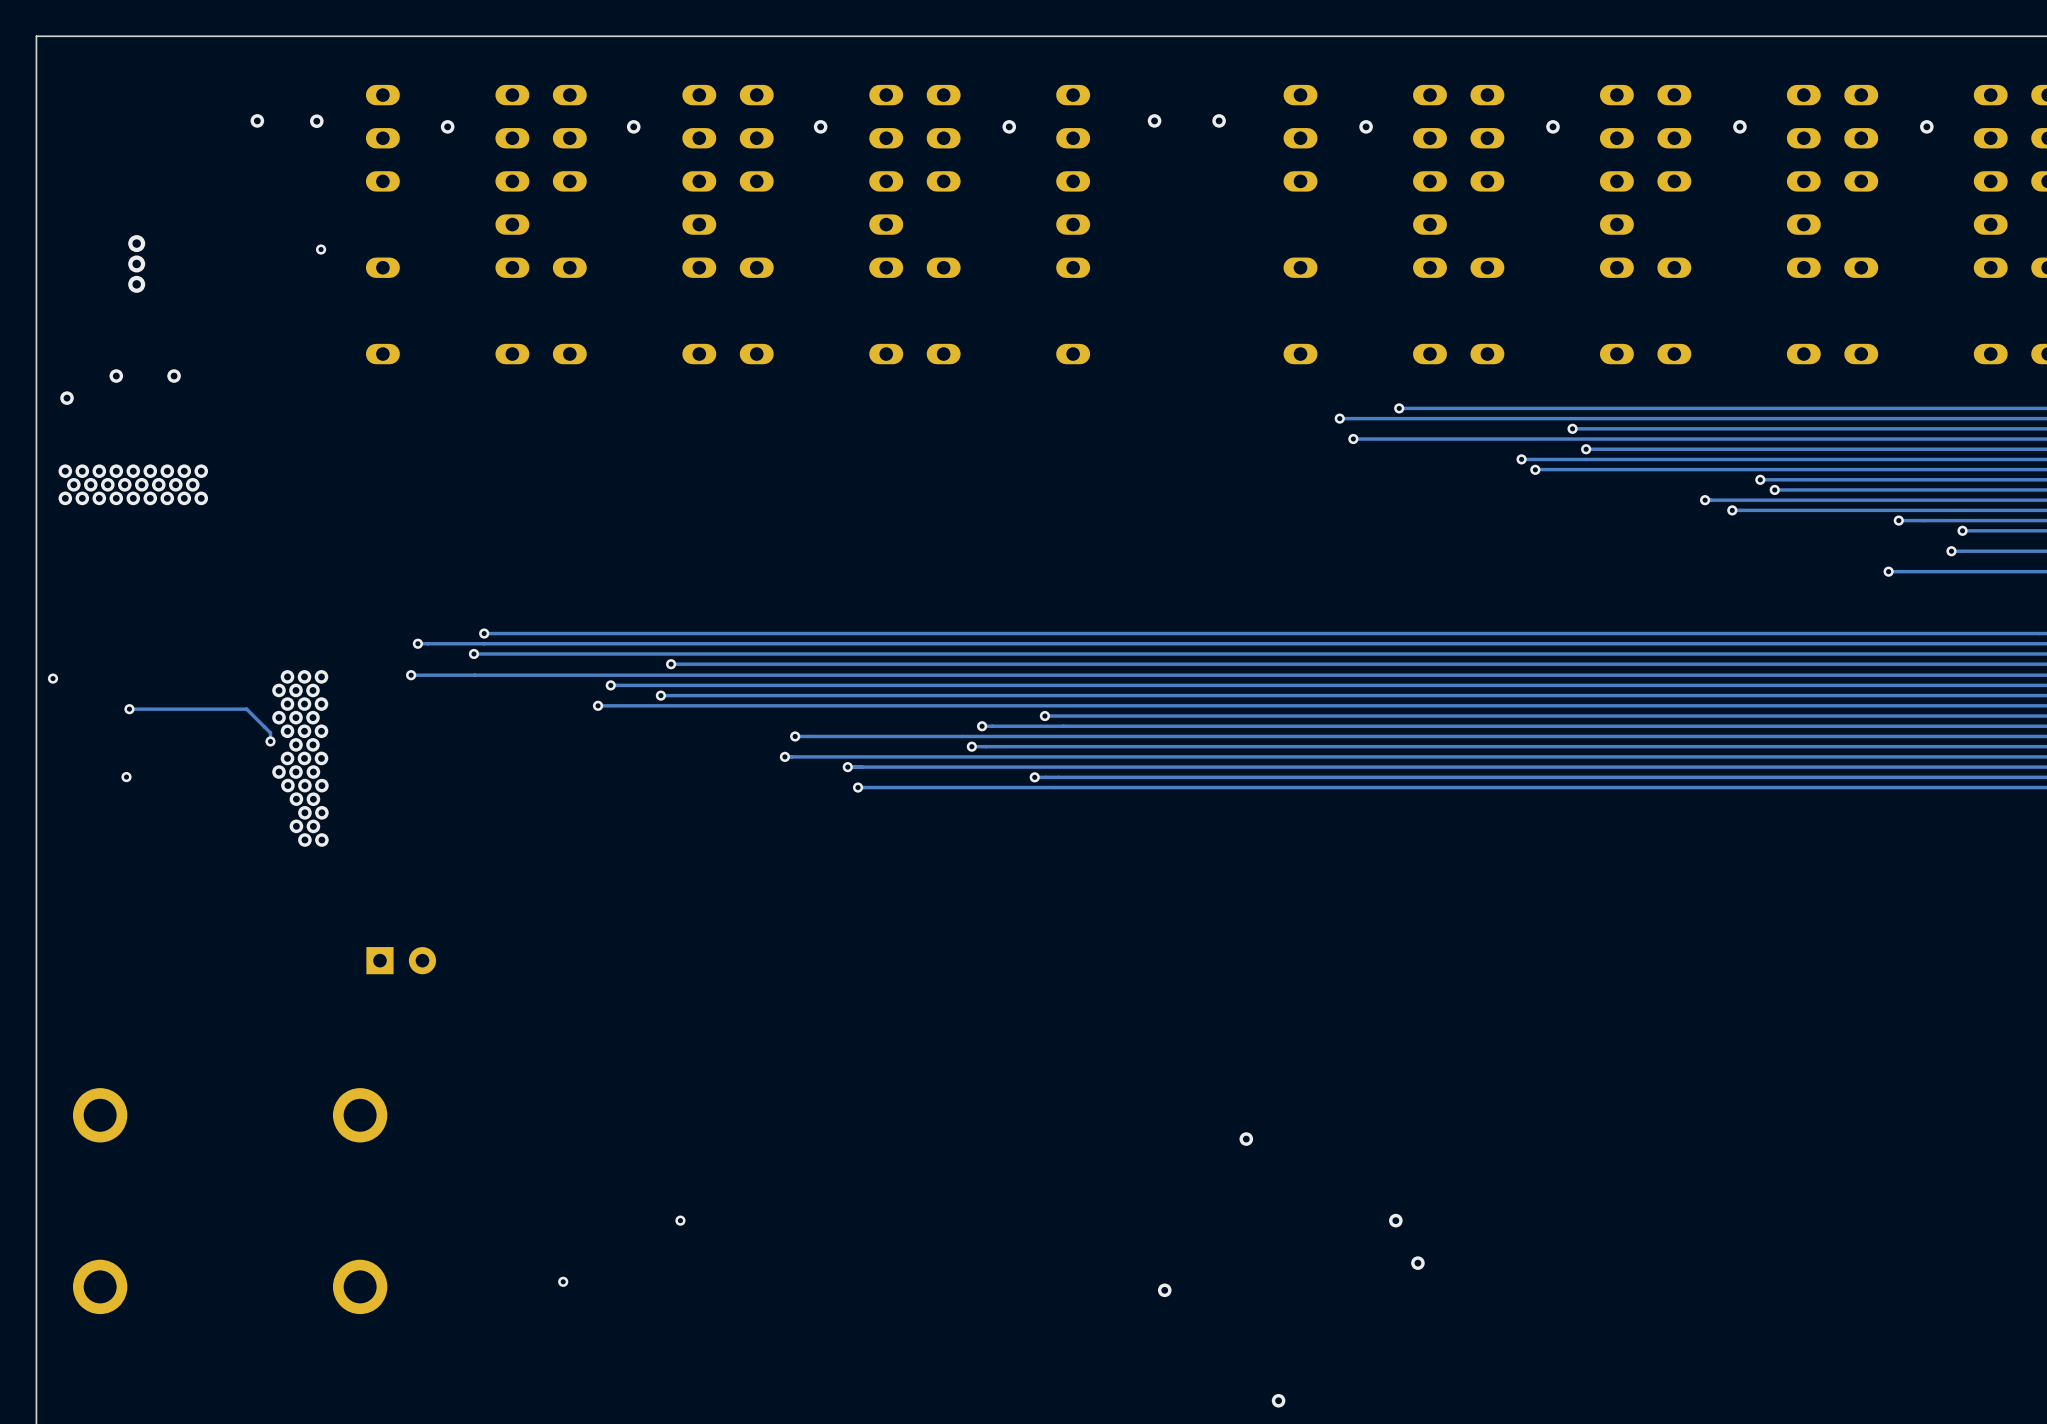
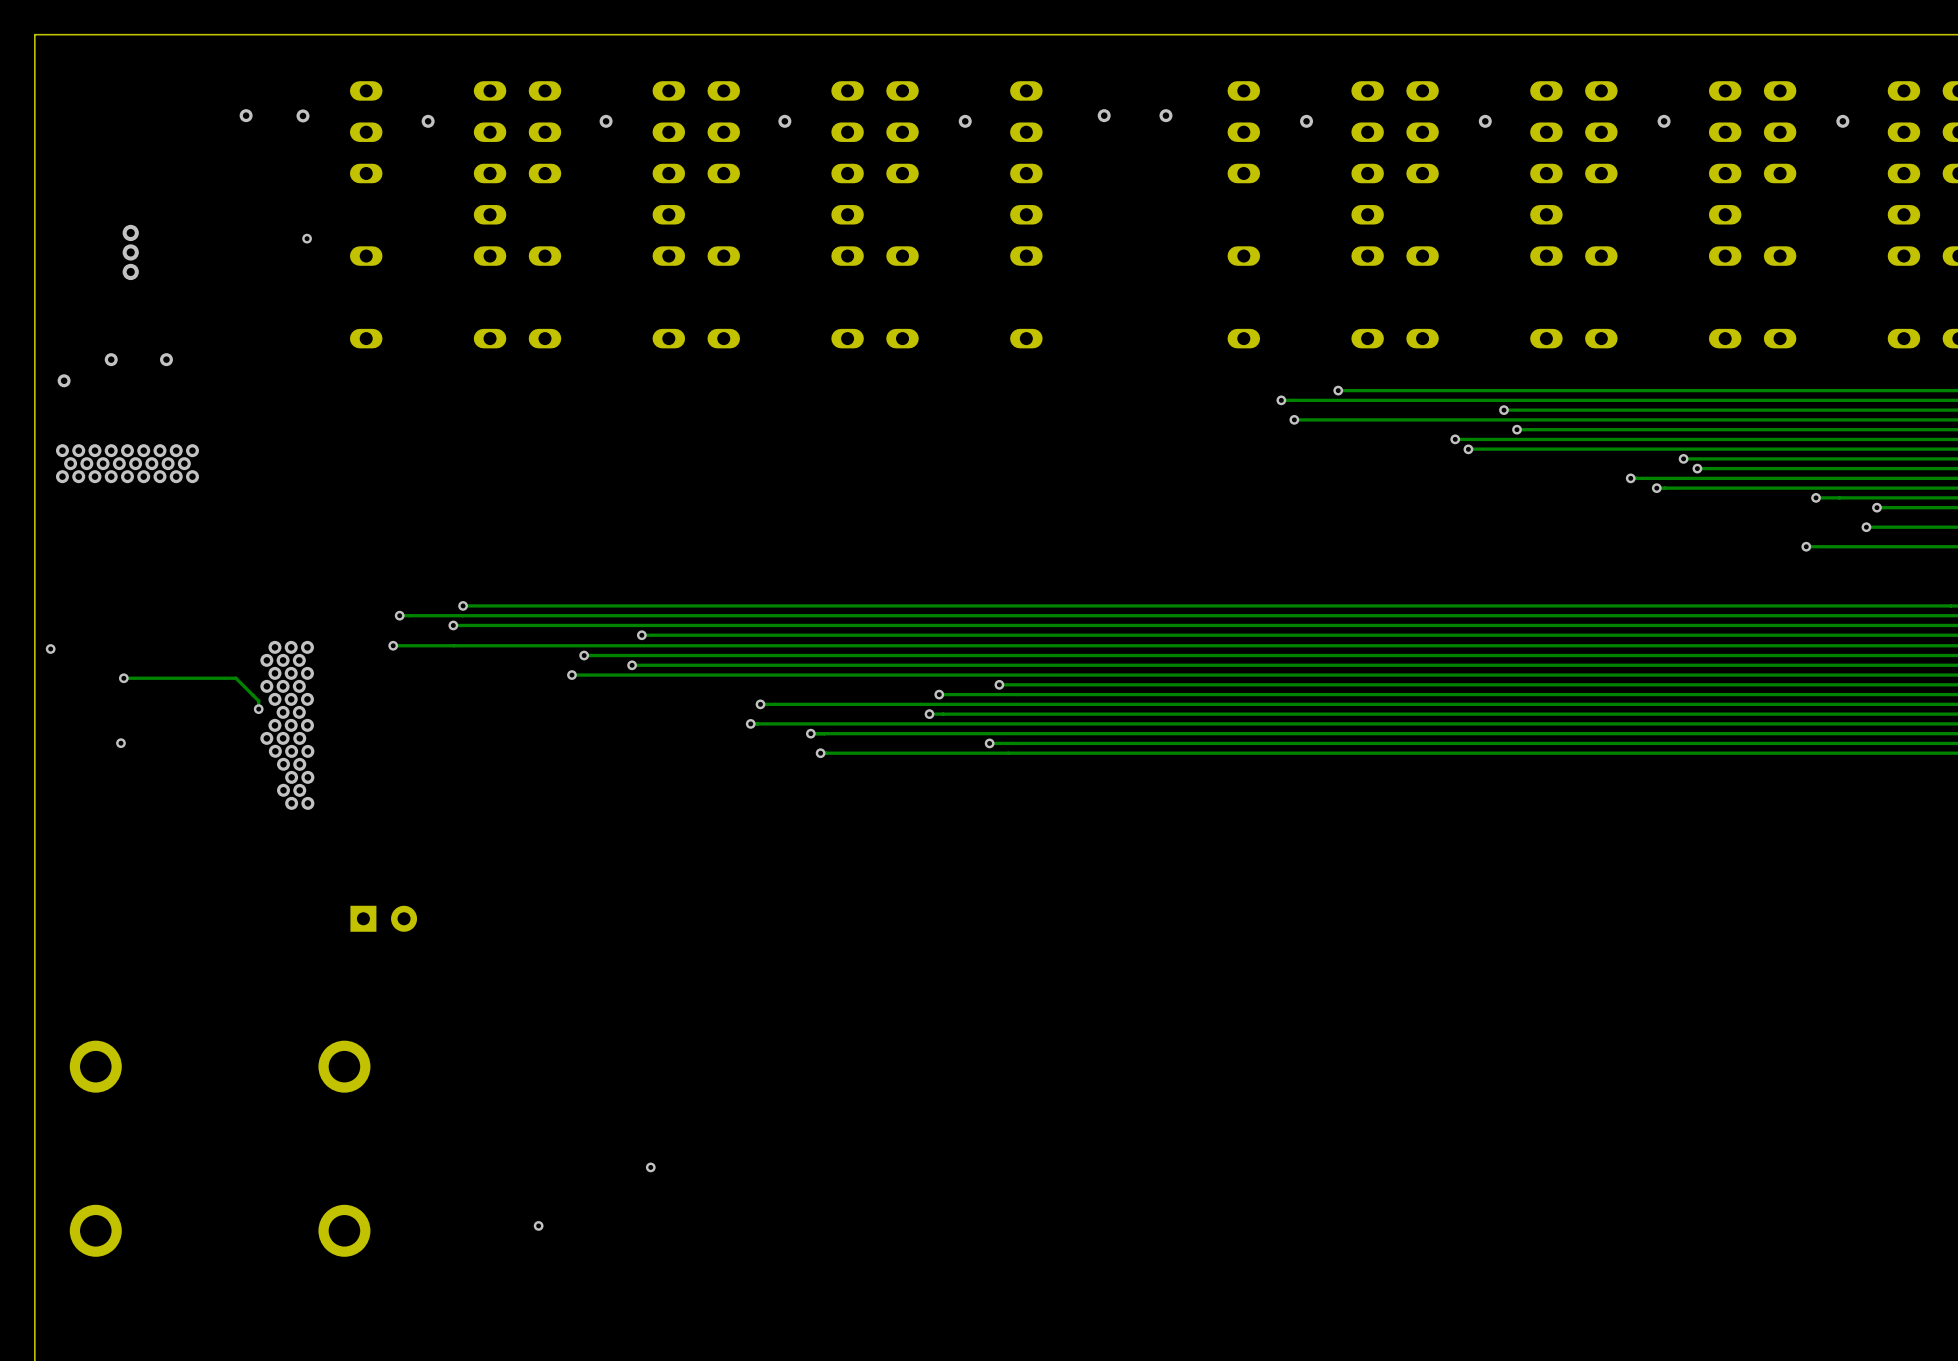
via: (1246, 1139) -> none
via: (1395, 1220) -> none
via: (1417, 1263) -> none
via: (1164, 1290) -> none
via: (1278, 1400) -> none

